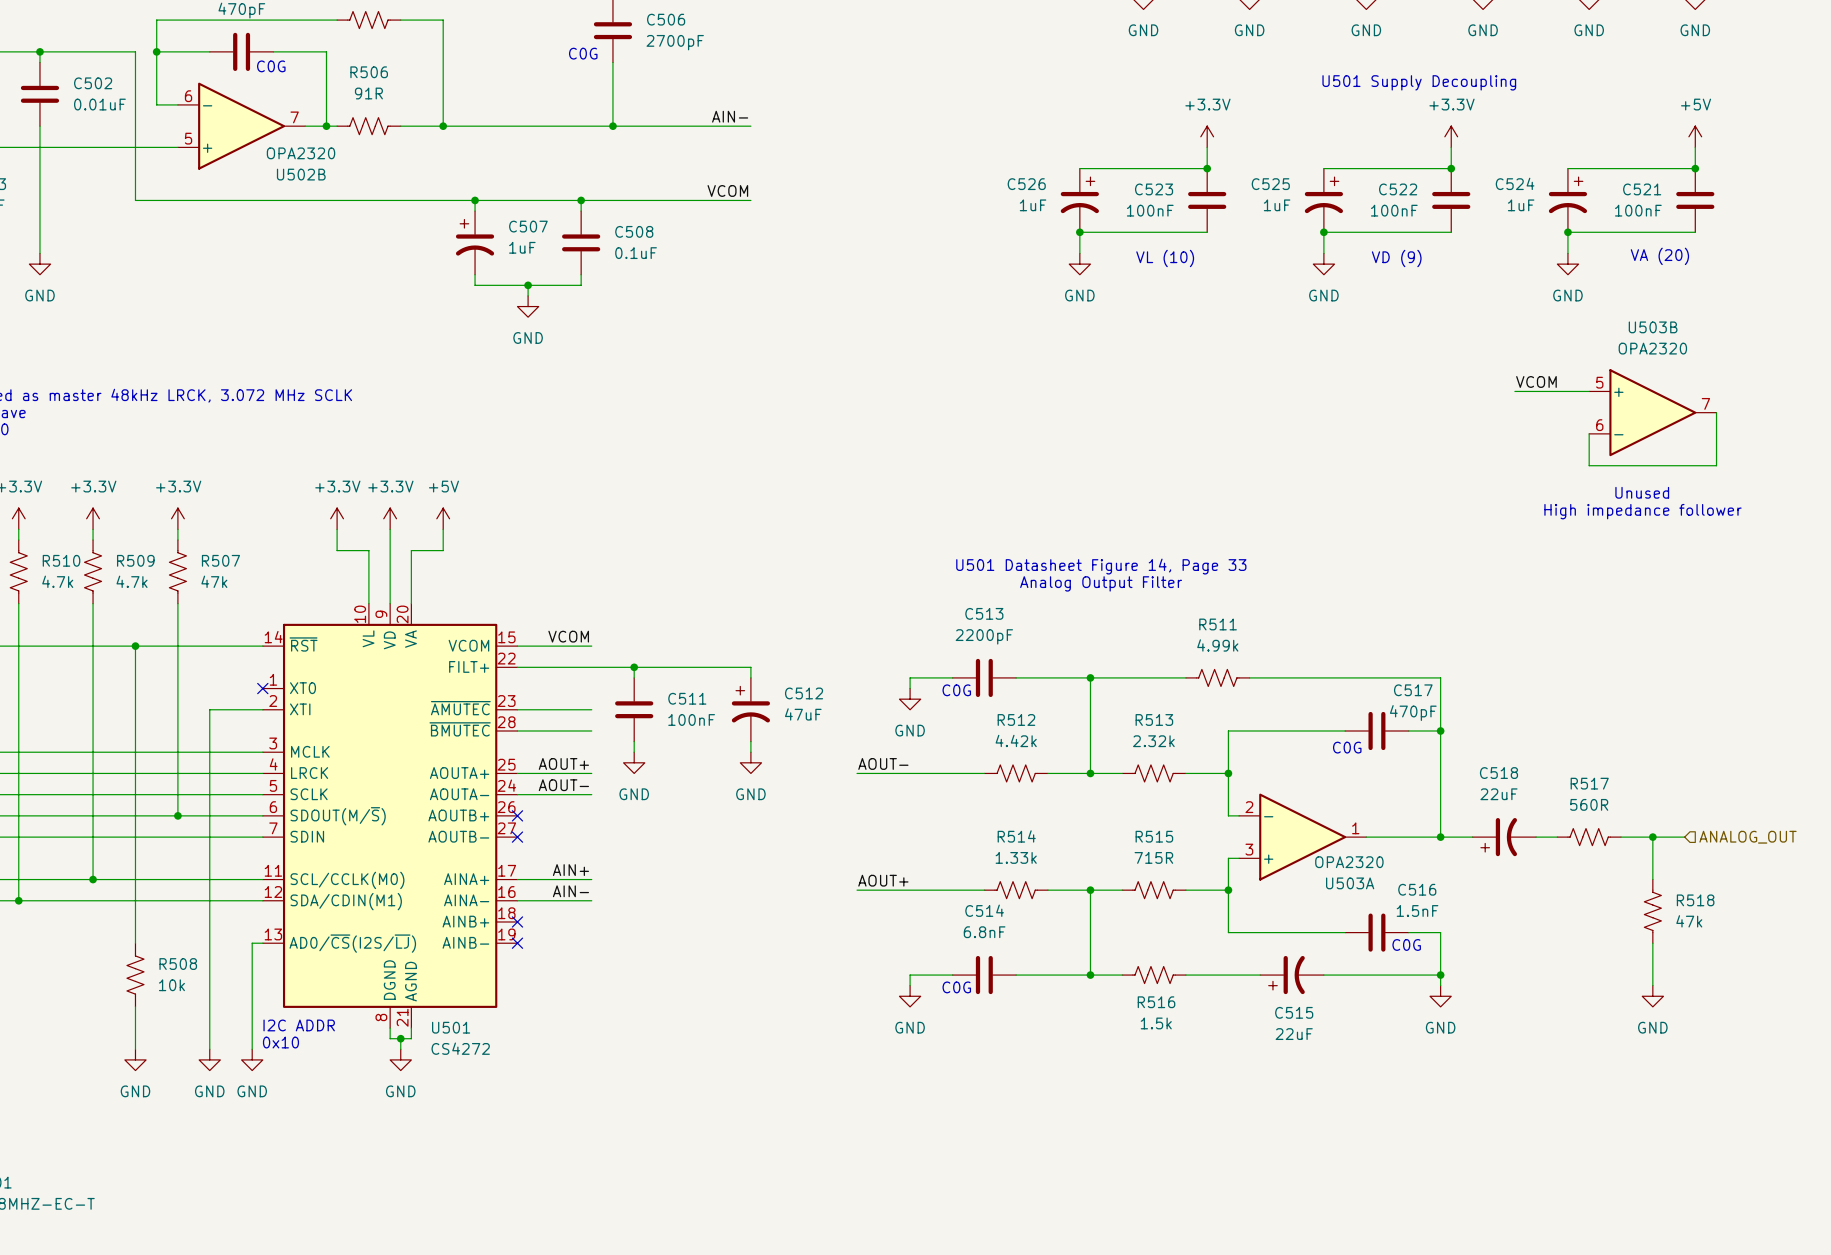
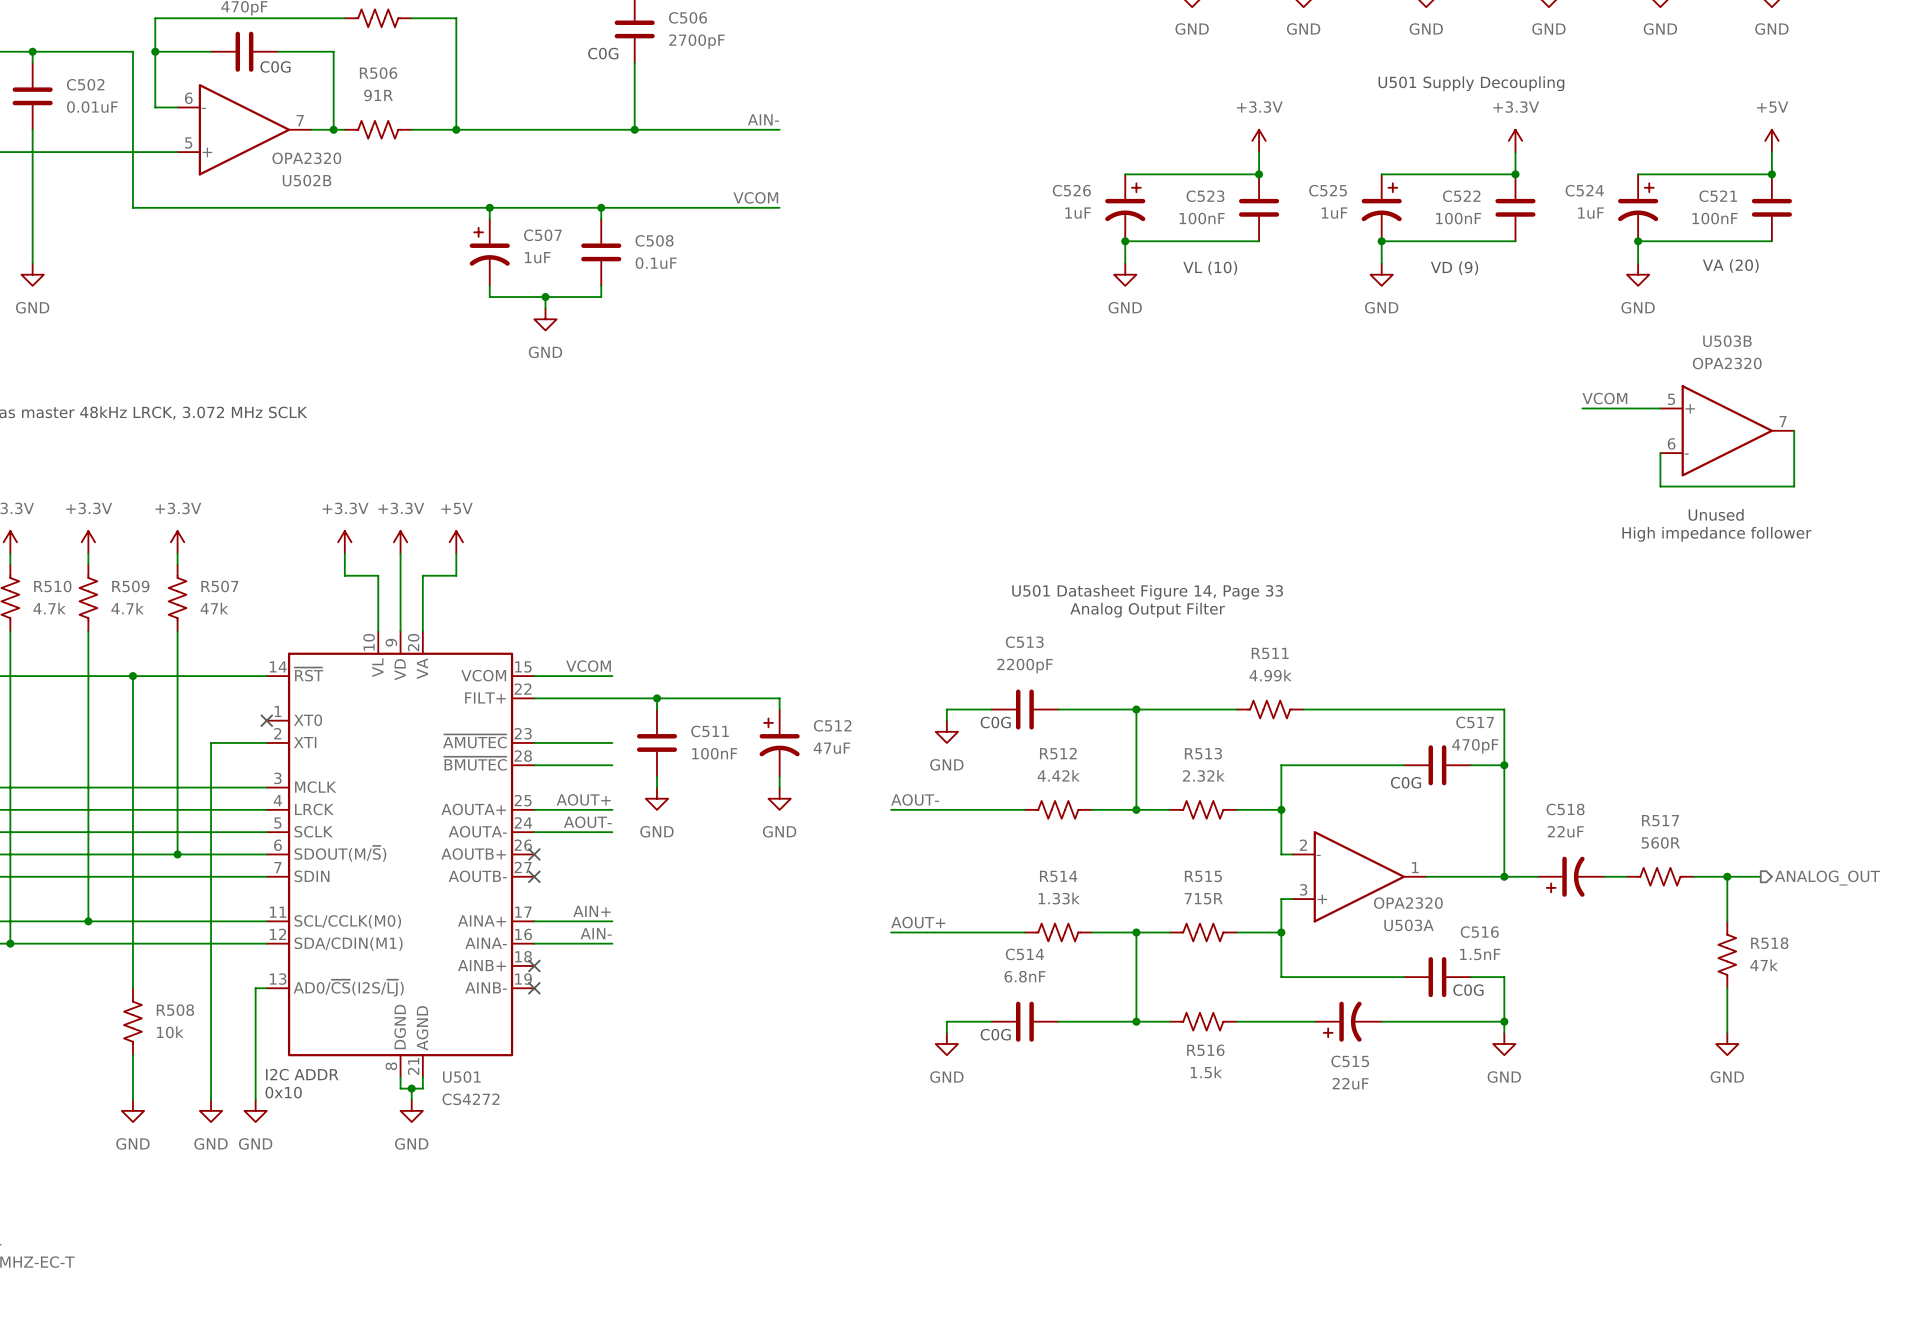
hierarchical label shape: input (1748, 837) -> output (1827, 878)

